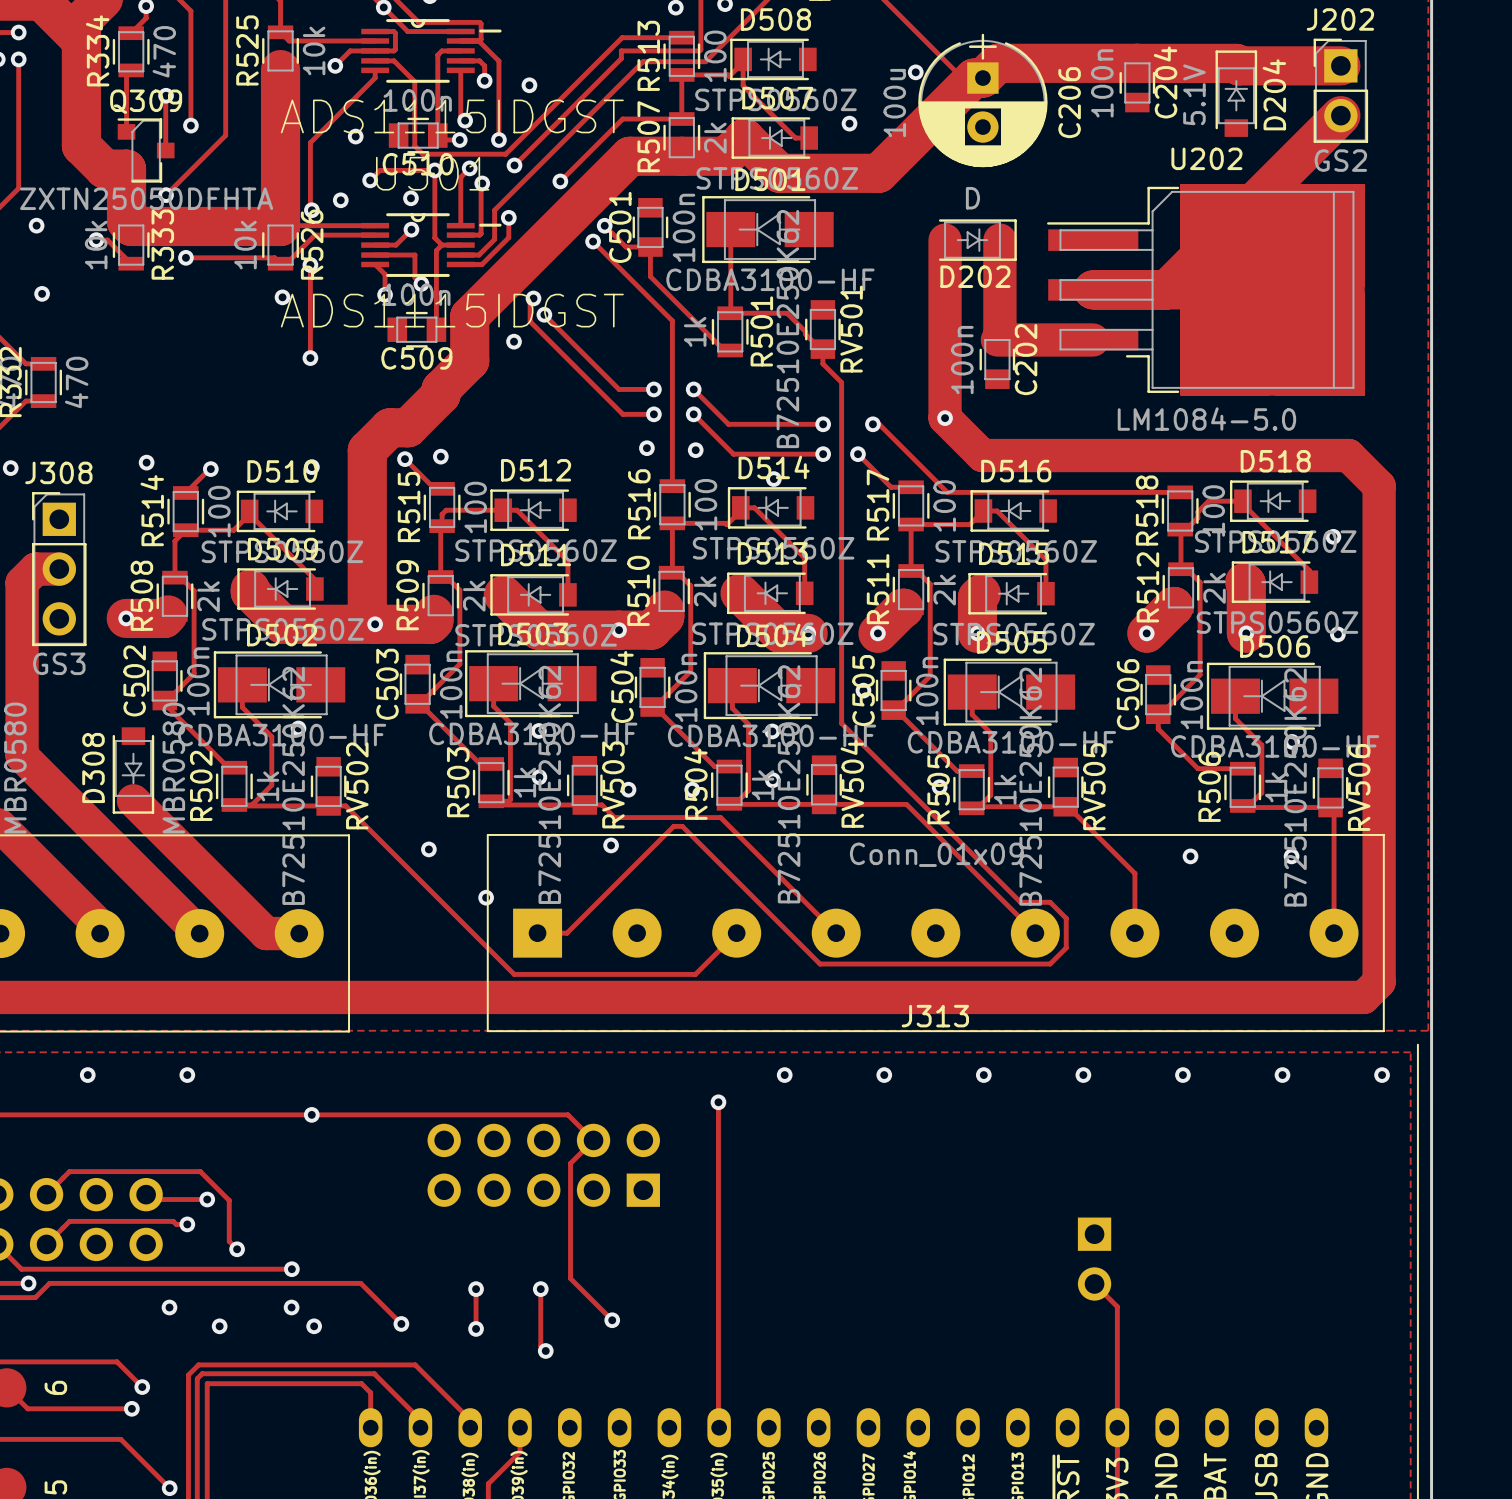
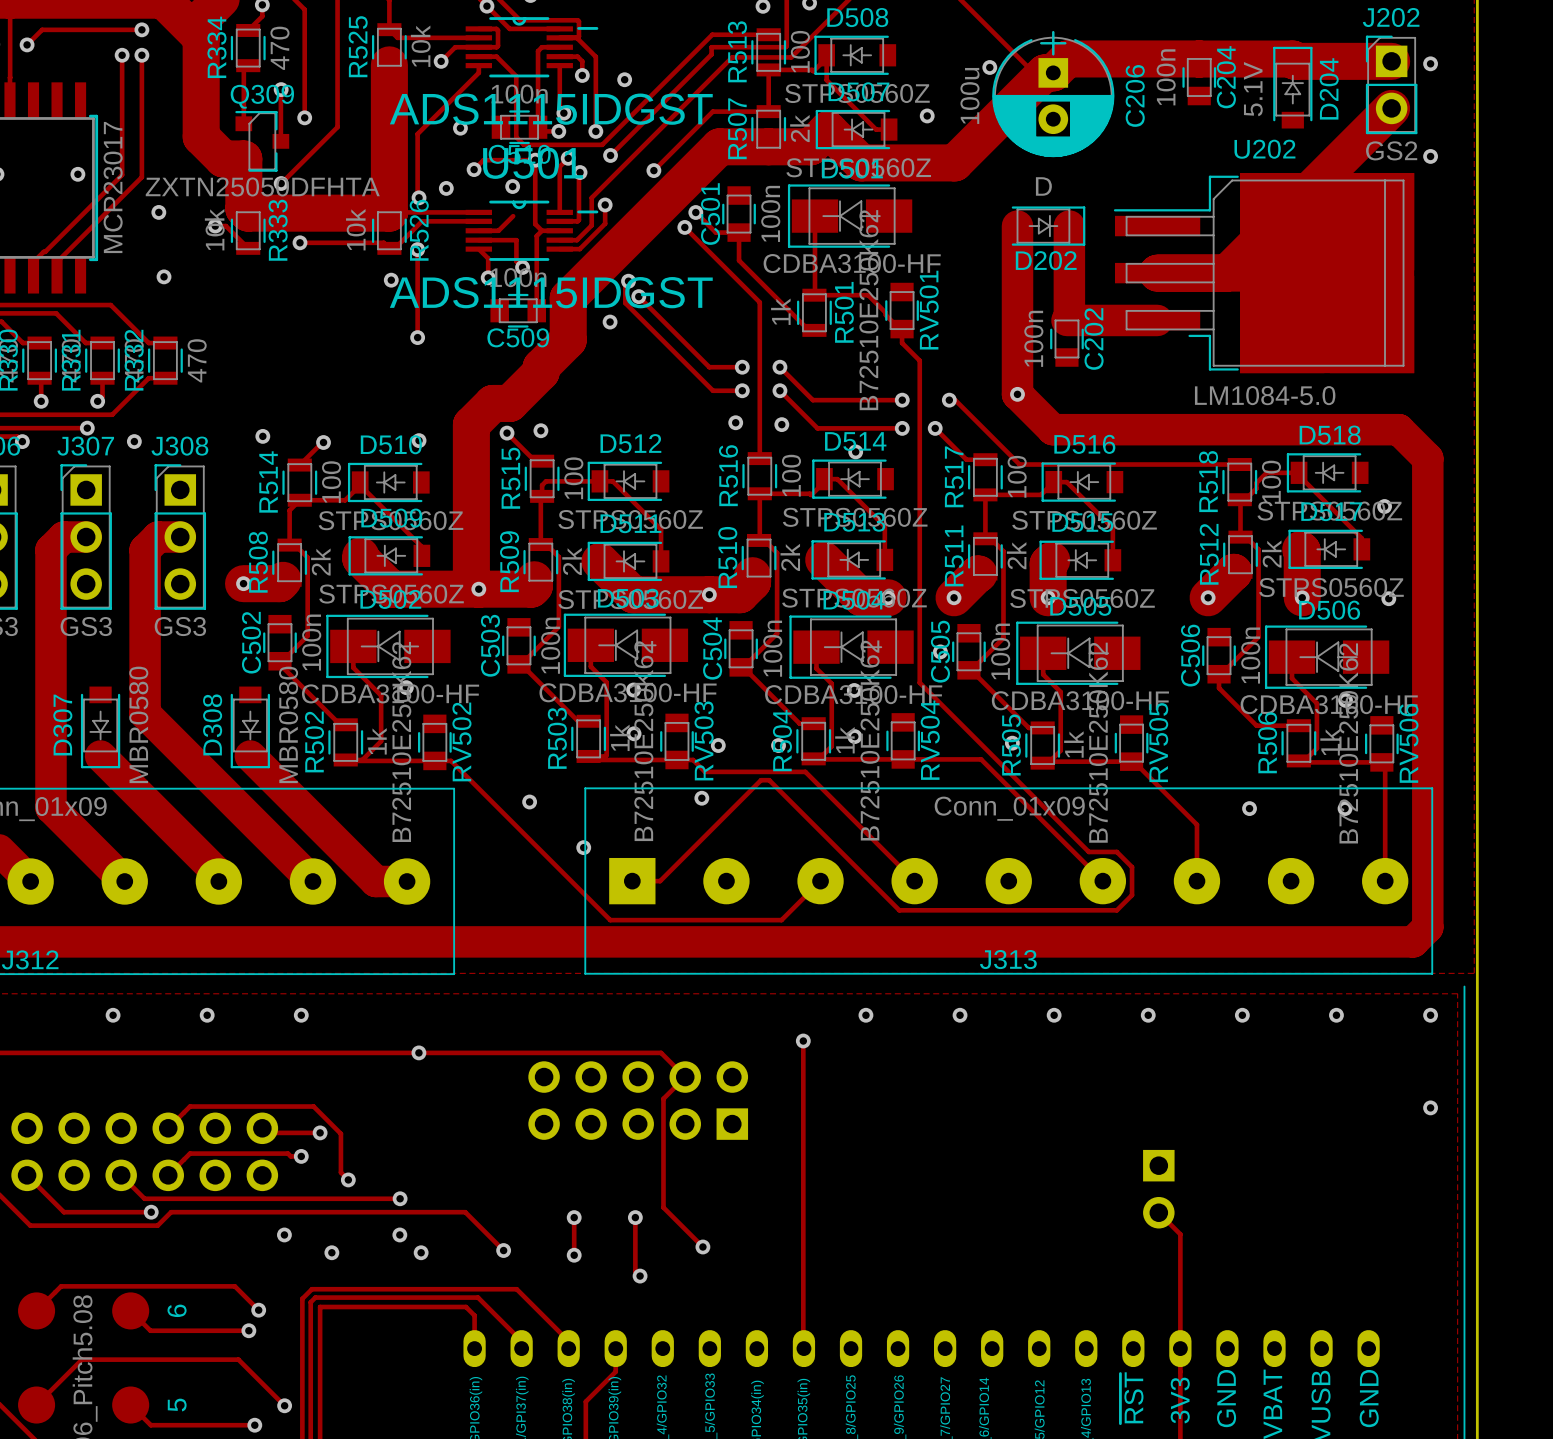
via: none -> (1430, 63)
via: none -> (1430, 156)
via: (411, 229) -> none
via: none -> (1430, 1107)

